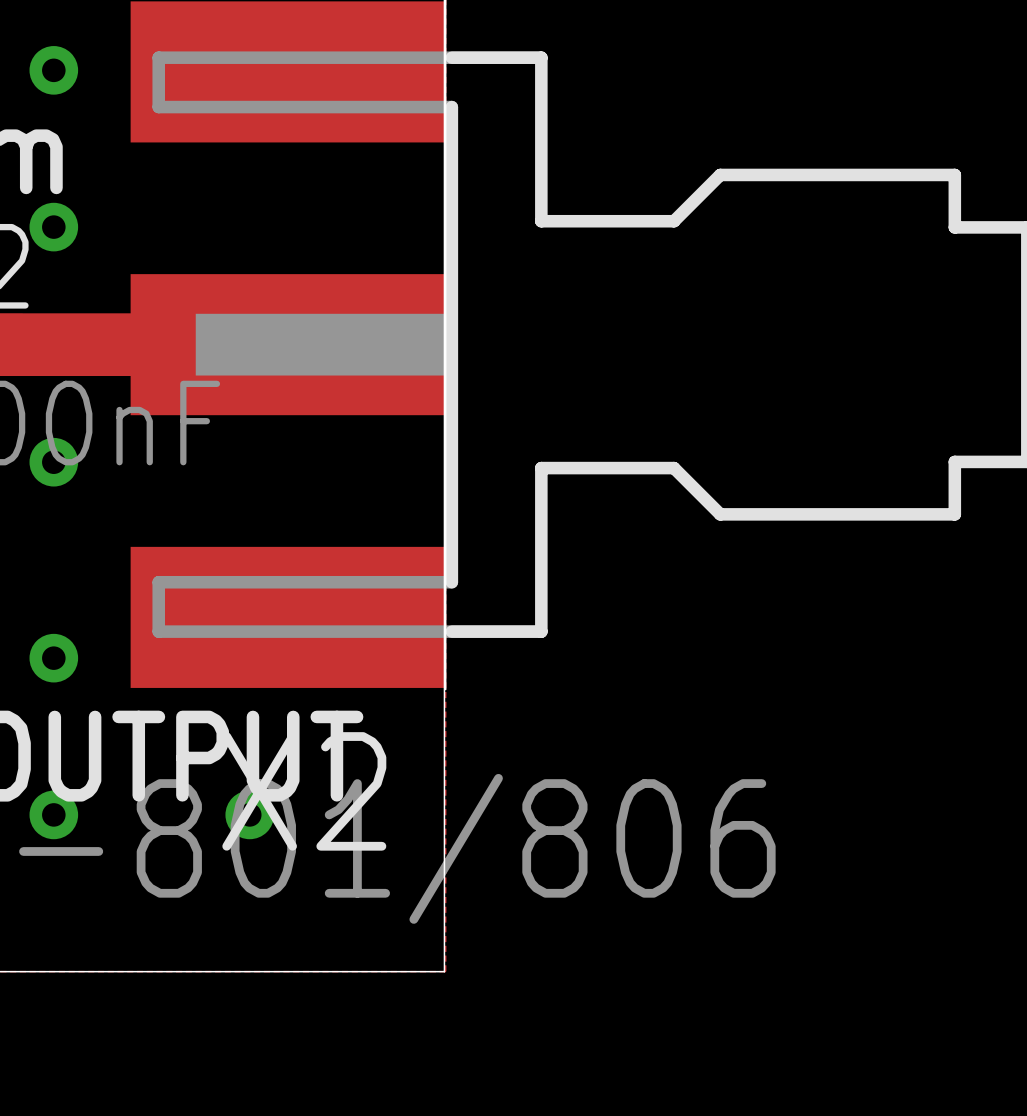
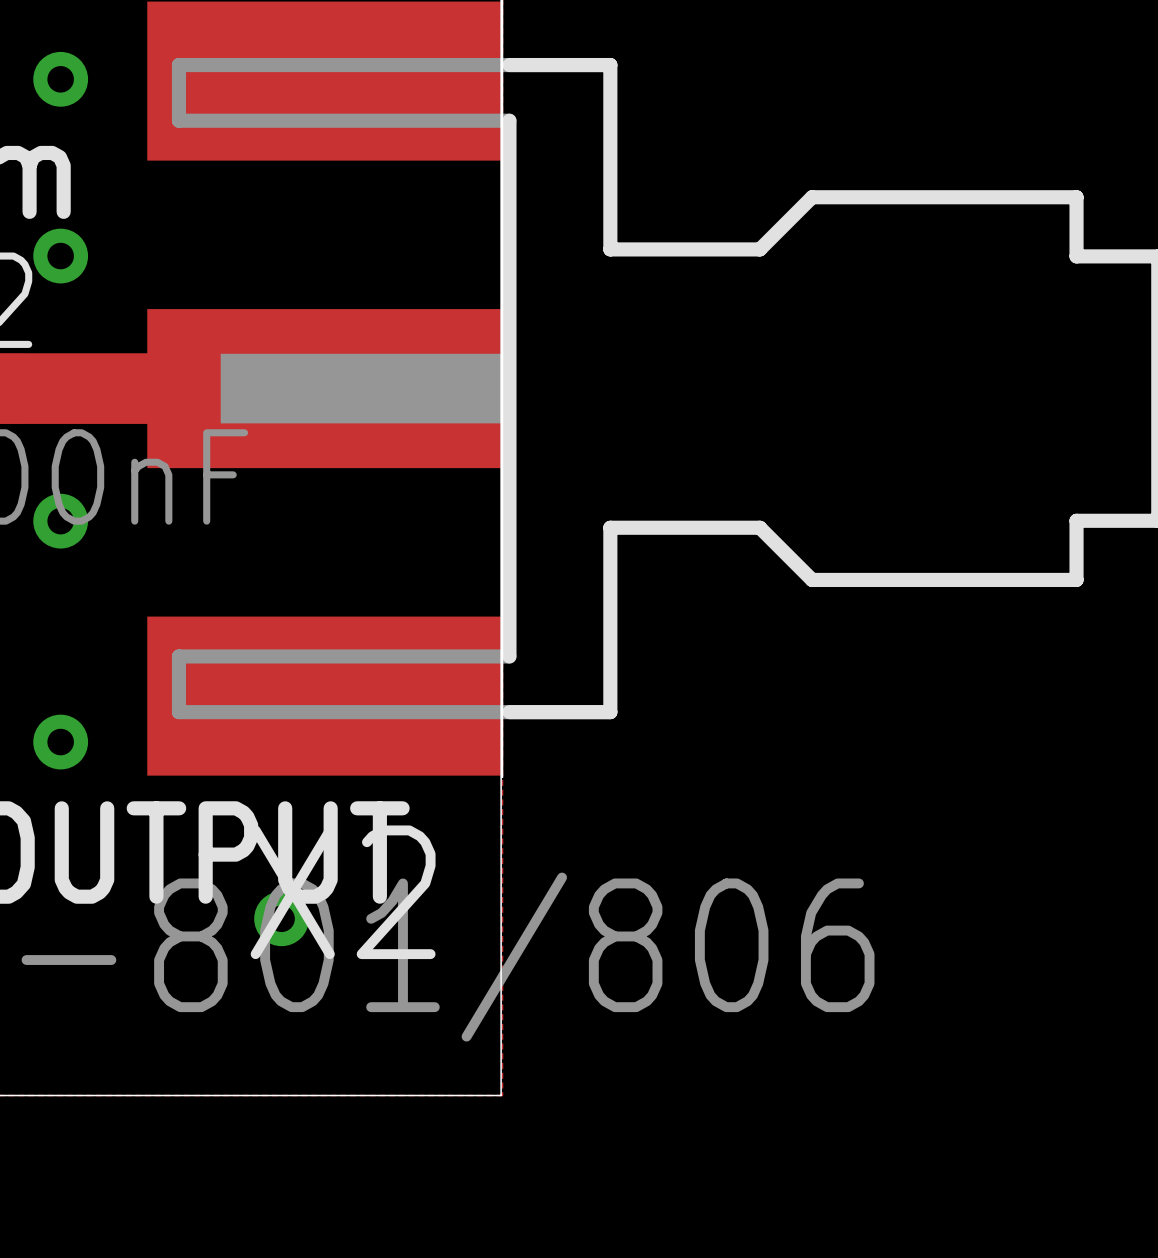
via: (53, 814) -> none

